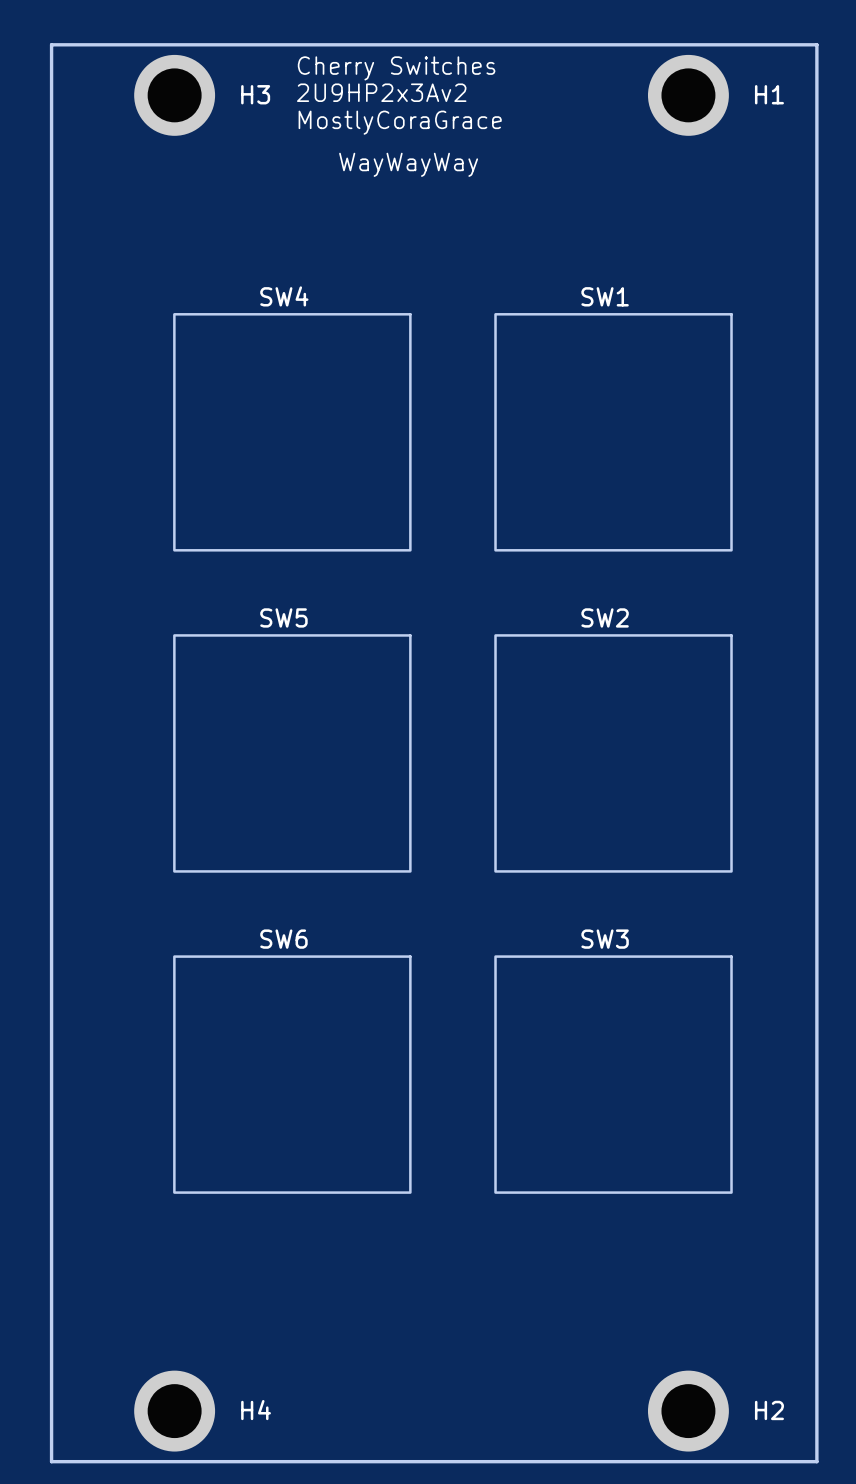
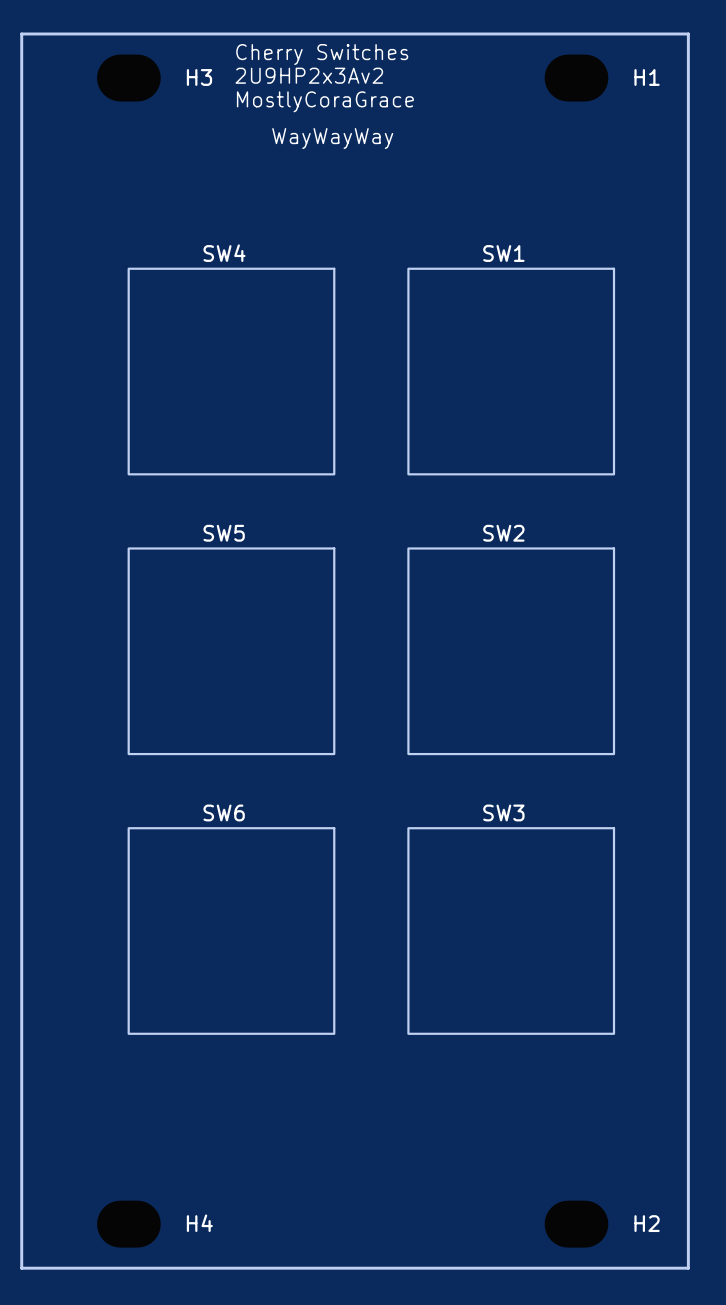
H3 footprint: [134, 54, 216, 136] -> [97, 54, 161, 102]
H1 footprint: [647, 54, 729, 136] -> [544, 54, 609, 102]
H4 footprint: [134, 1370, 216, 1452] -> [97, 1200, 161, 1248]
H2 footprint: [647, 1370, 729, 1452] -> [544, 1200, 609, 1248]

